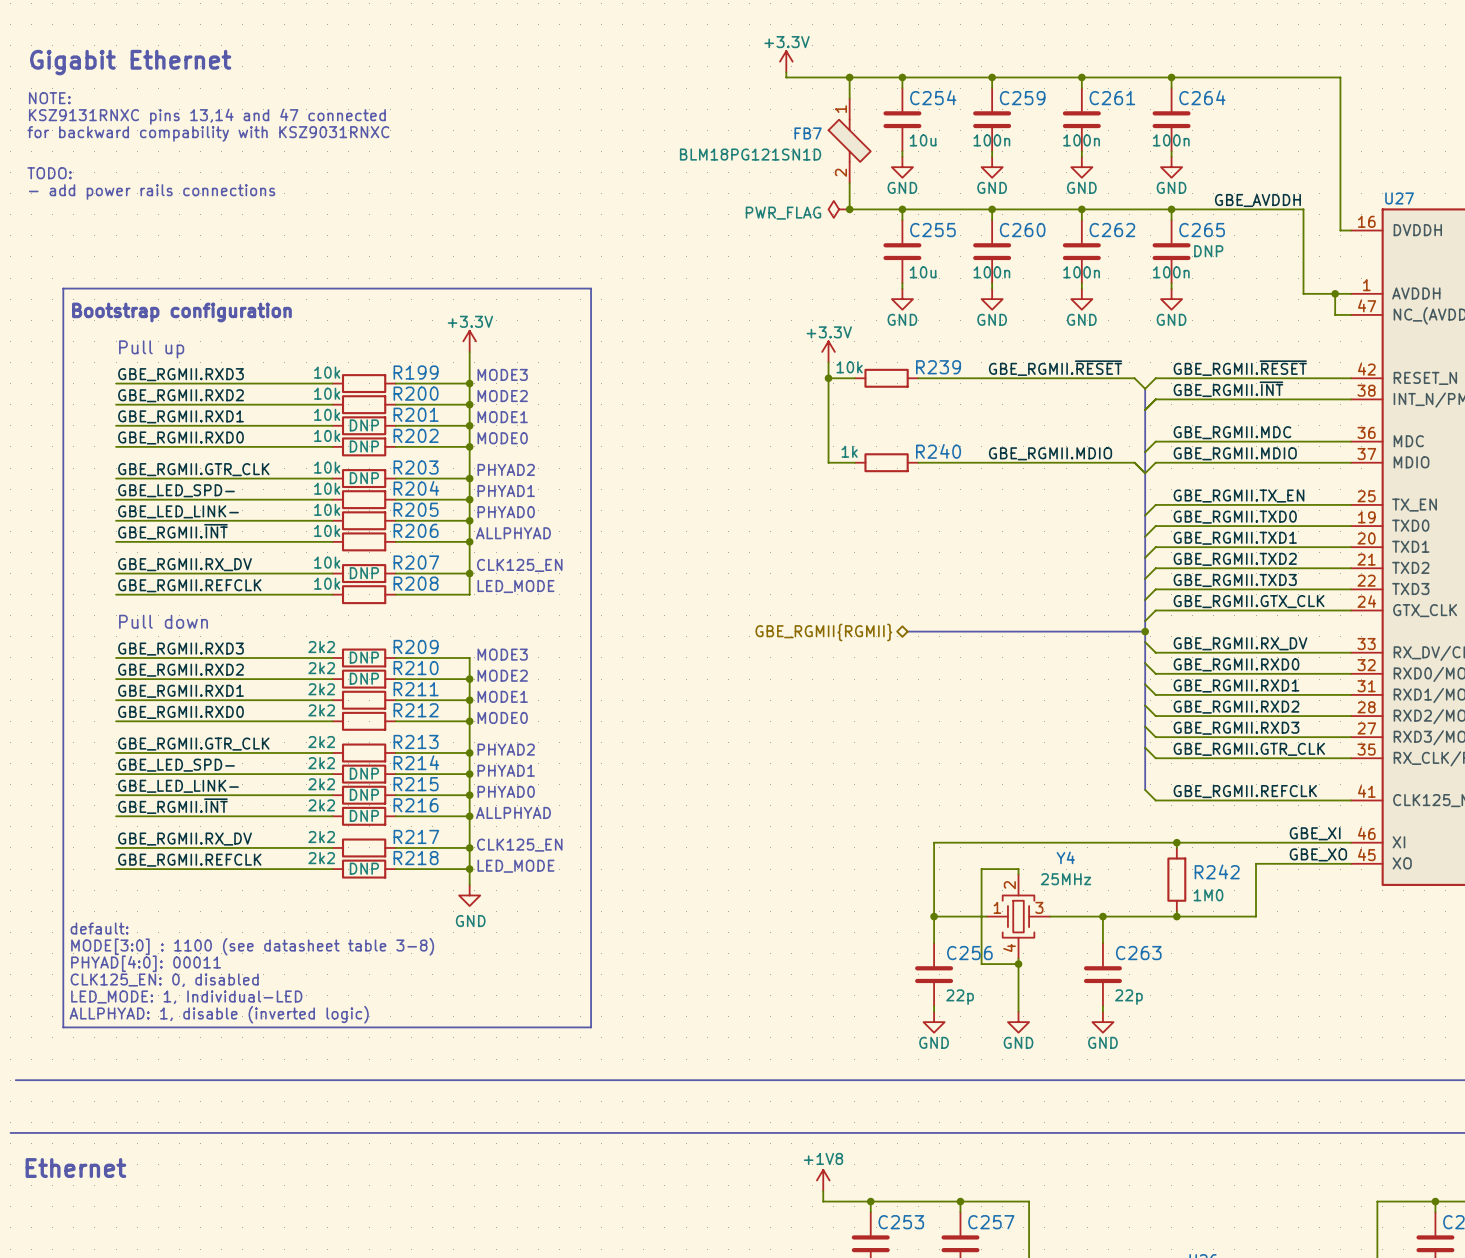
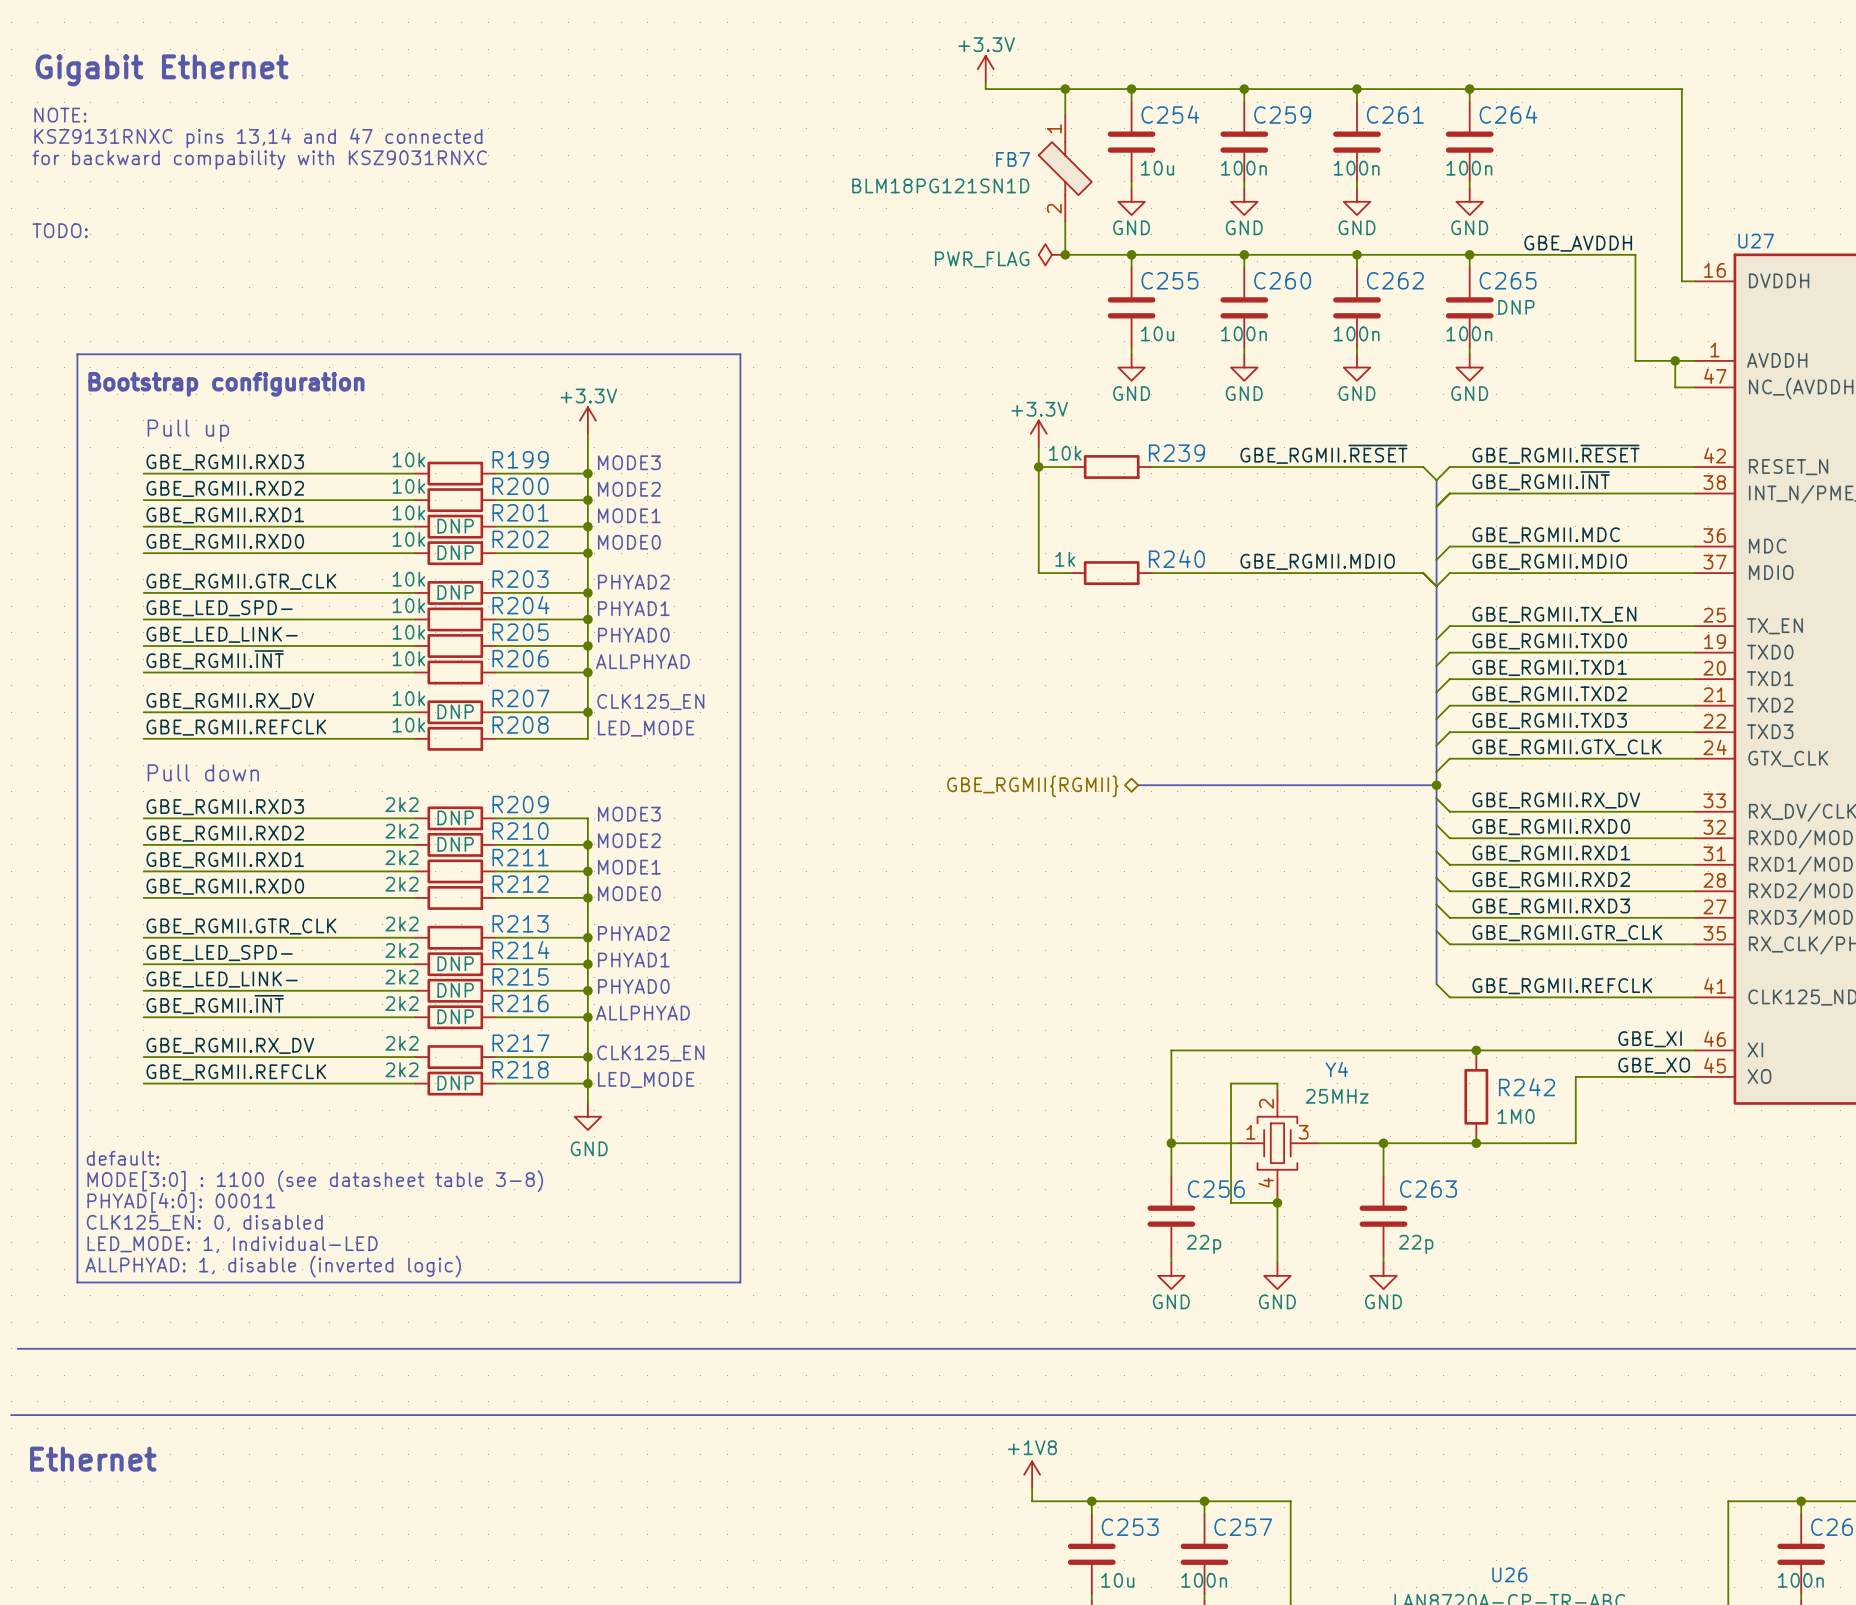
text: TODO: (49, 173) -> none
text: - add power rails connections (152, 191) -> TODO: (60, 230)

